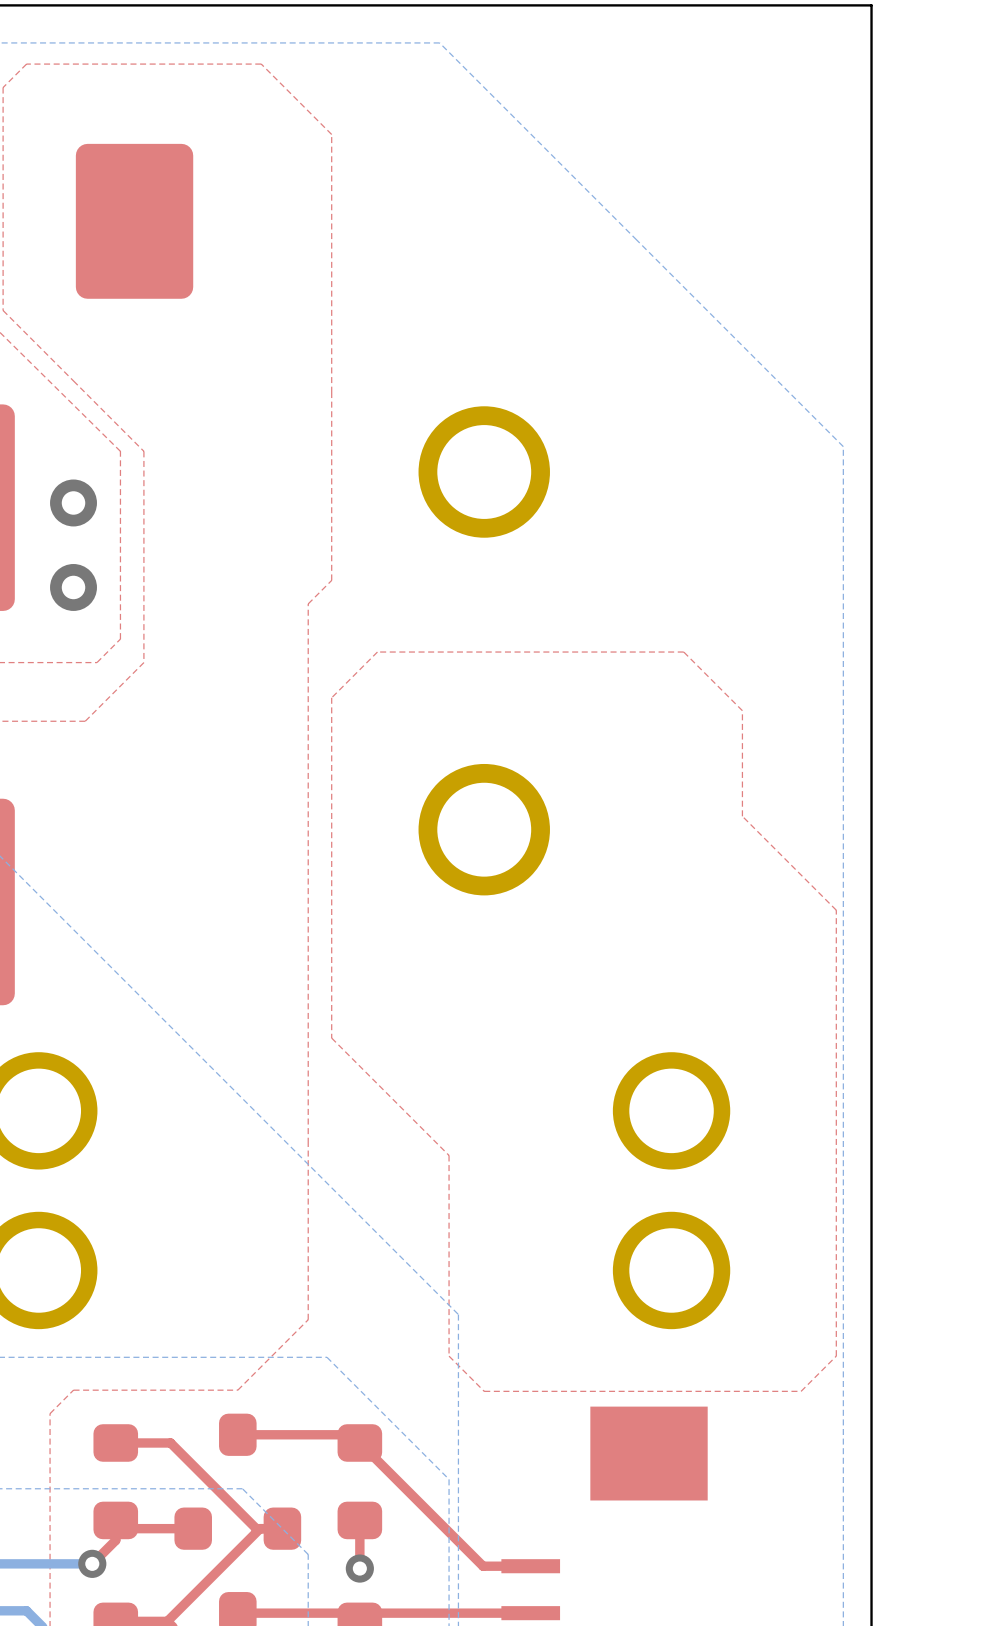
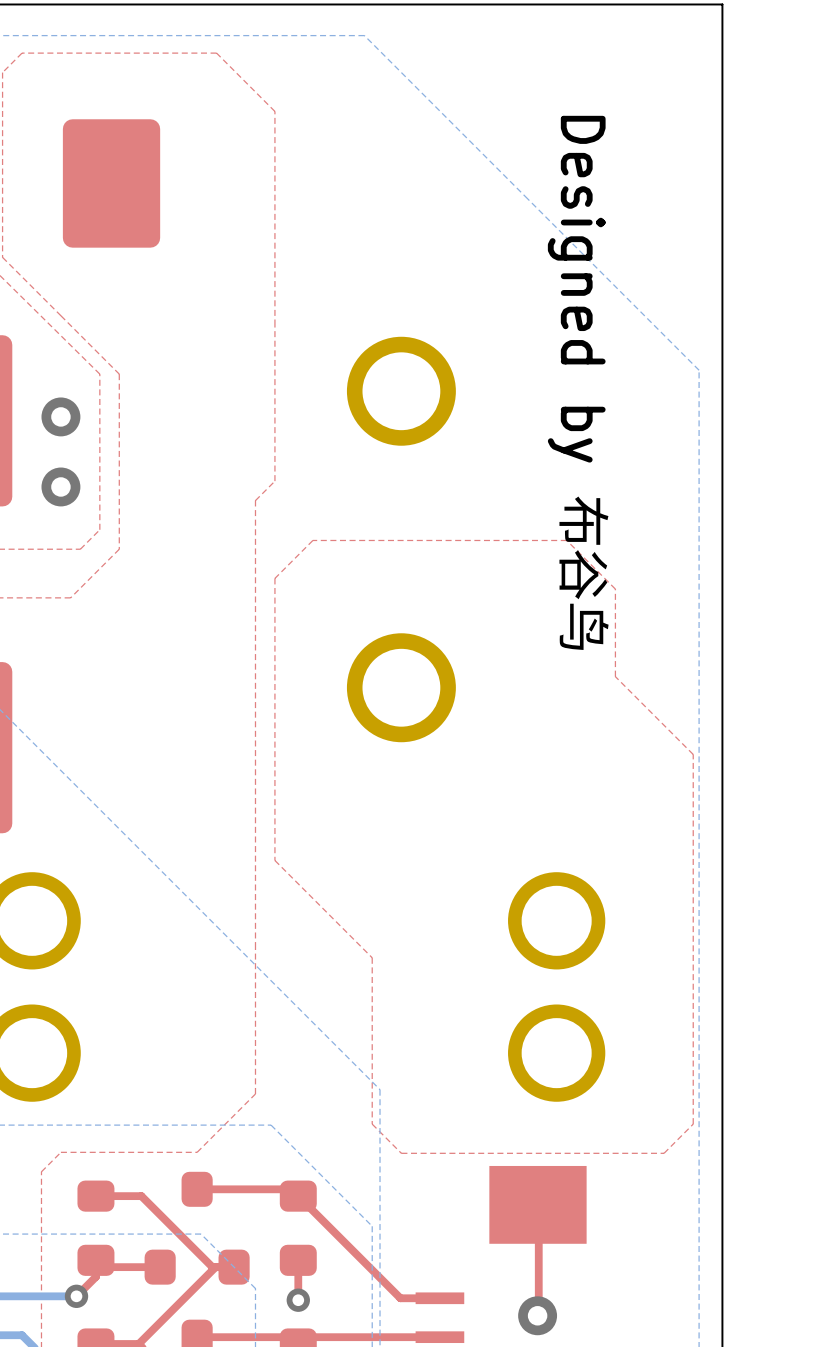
text: none -> Designed by 布谷鸟 (579, 384)
top track: none -> (538, 1232) (537, 1315)
via: none -> (537, 1315)

